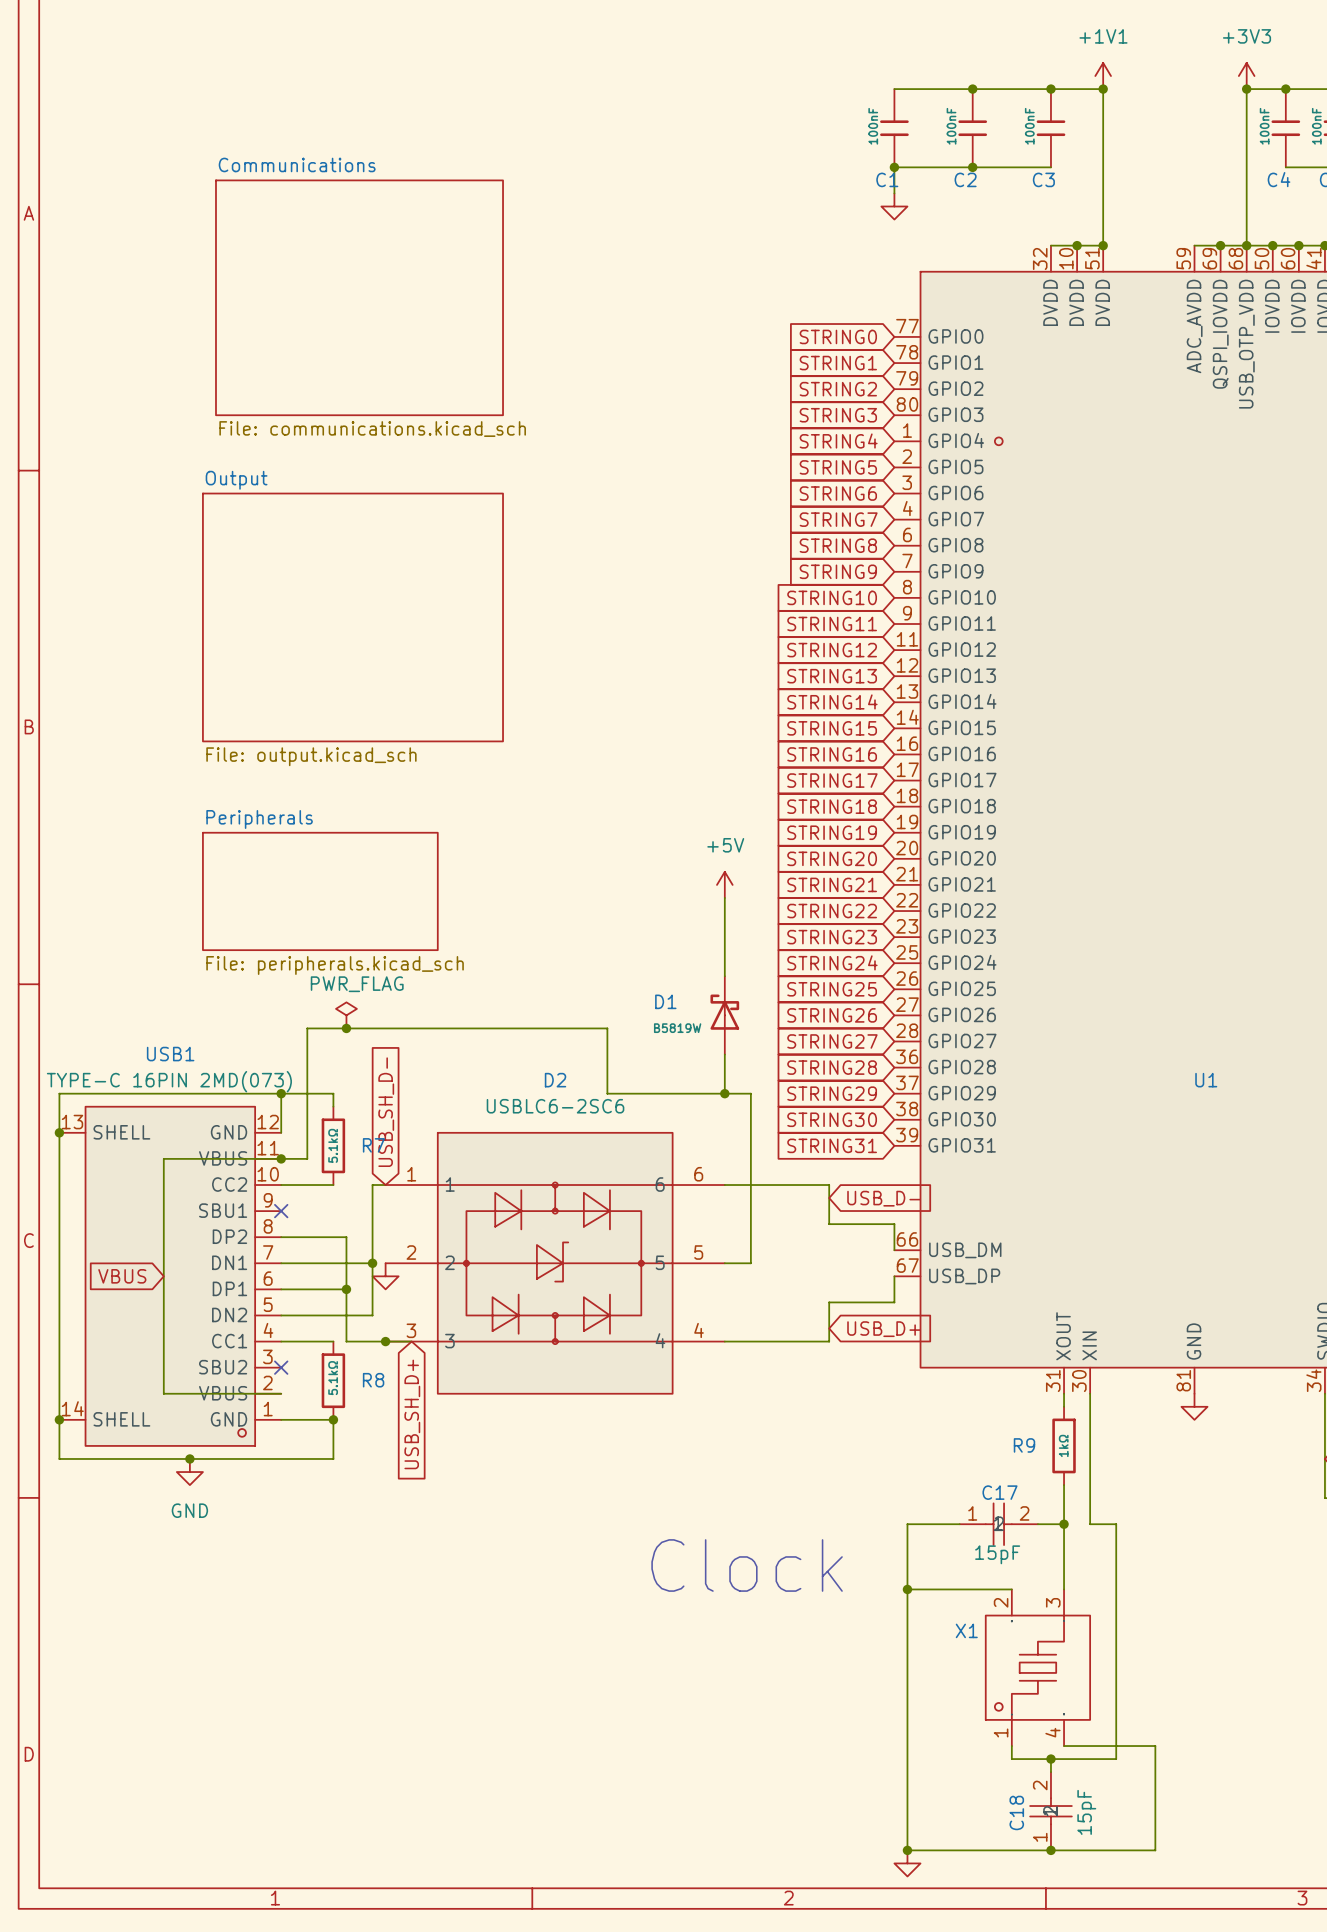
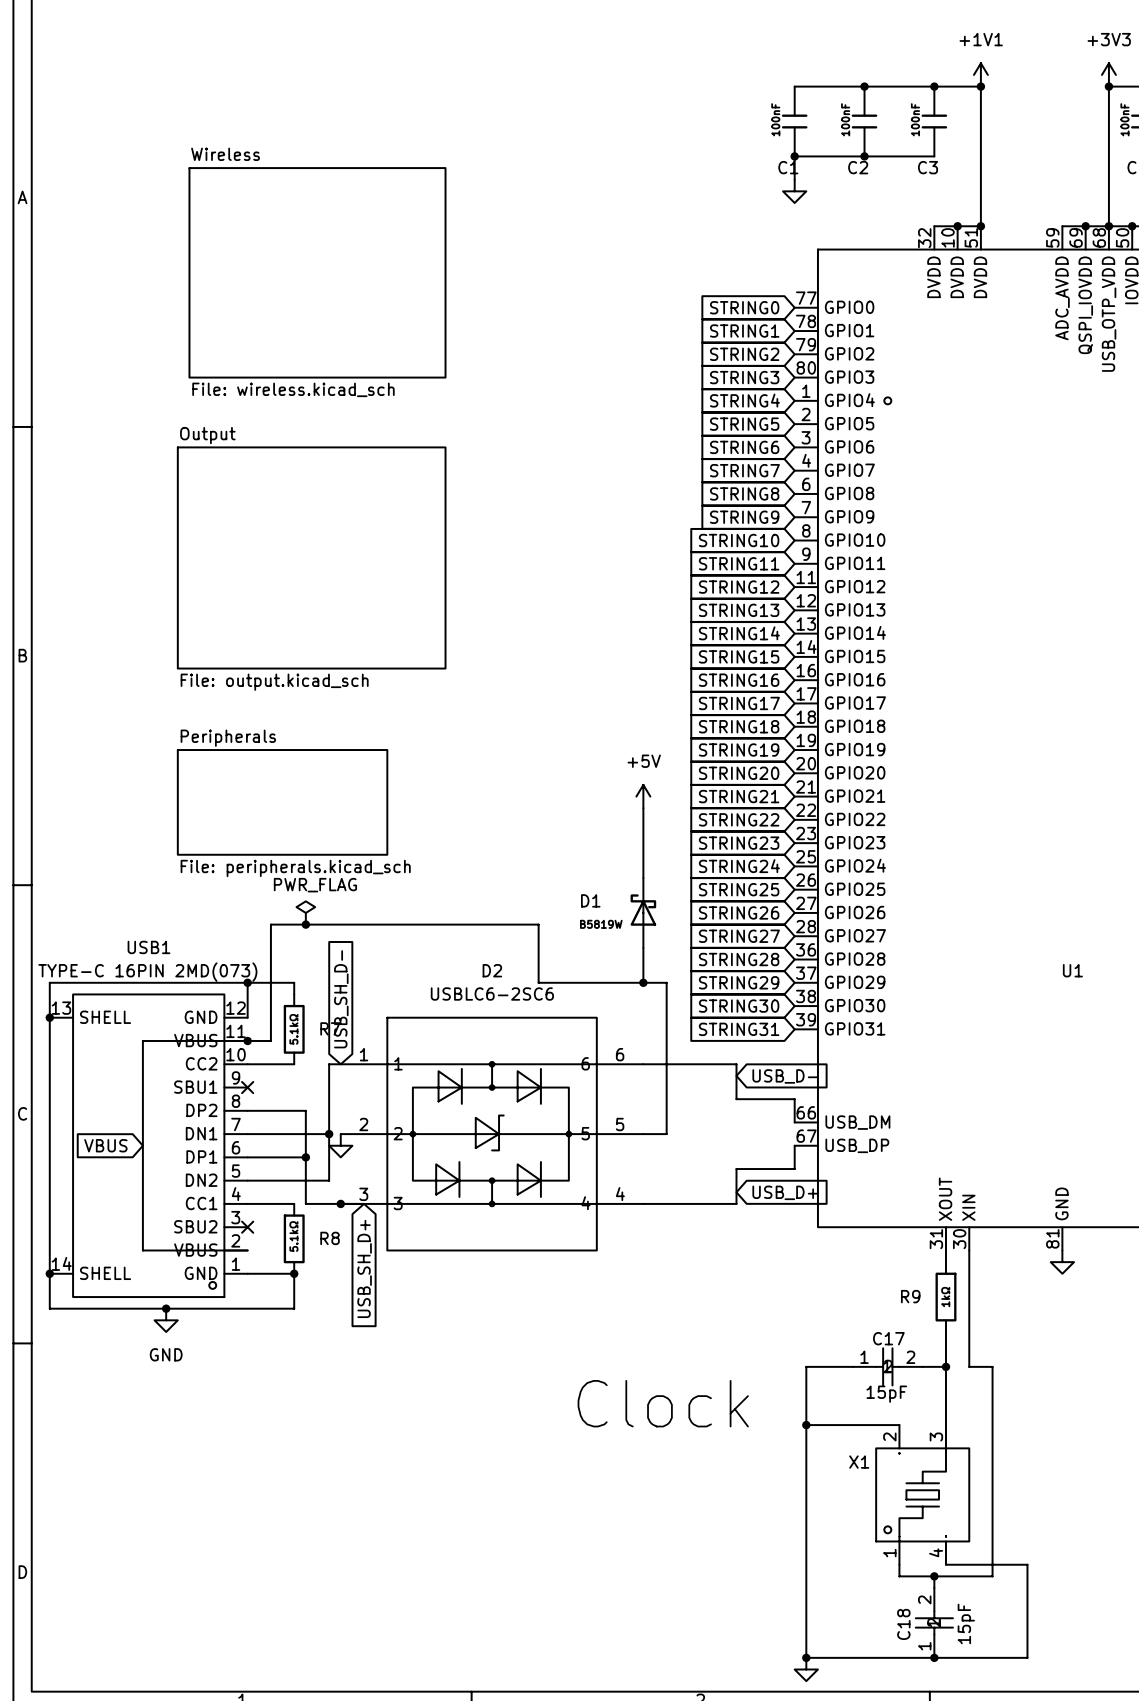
sheet Communications name: Communications (297, 164) -> Wireless (225, 154)
sheet Communications value: File: communications.kicad_sch (372, 429) -> File: wireless.kicad_sch (293, 389)

